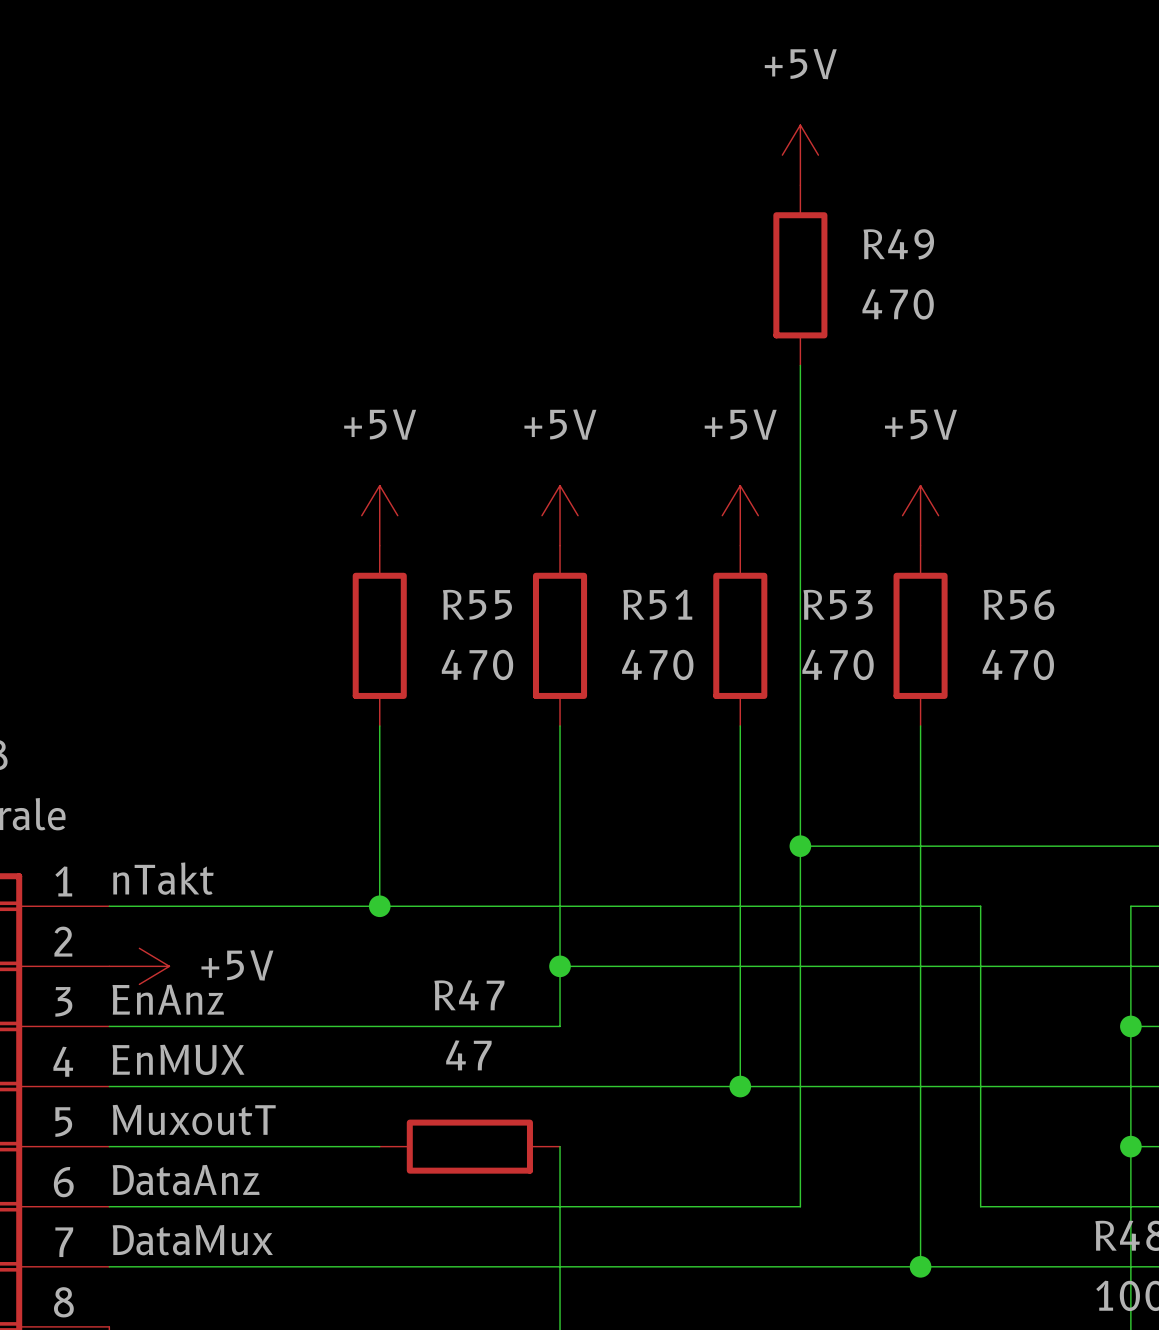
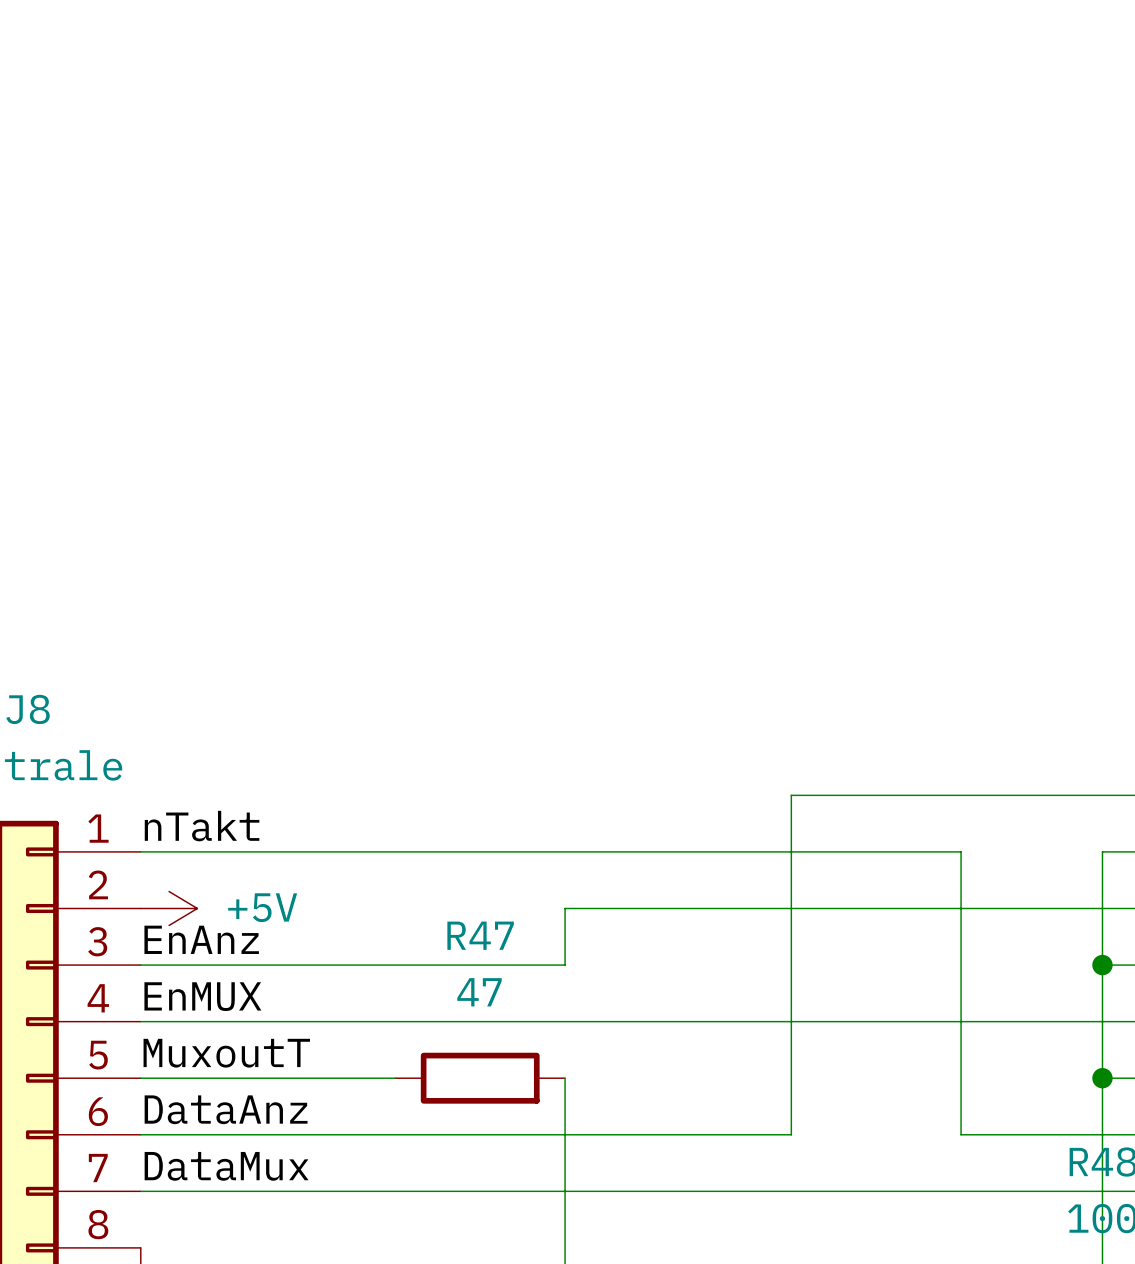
power symbol: +5V (800, 155) -> none
R49: 470 (800, 275) -> none
wire: (800, 365) (800, 846) -> none
power symbol: +5V (379, 515) -> none
power symbol: +5V (560, 515) -> none
power symbol: +5V (740, 515) -> none
power symbol: +5V (920, 515) -> none
R55: 470 (379, 635) -> none
R51: 470 (560, 635) -> none
R53: 470 (740, 635) -> none
R56: 470 (920, 635) -> none
wire: (379, 725) (379, 906) -> none
wire: (560, 725) (560, 966) -> none
wire: (740, 725) (740, 1086) -> none
wire: (920, 725) (920, 1266) -> none
junction: (800, 846) -> none
junction: (379, 906) -> none
junction: (560, 966) -> none
junction: (740, 1086) -> none
junction: (920, 1266) -> none

